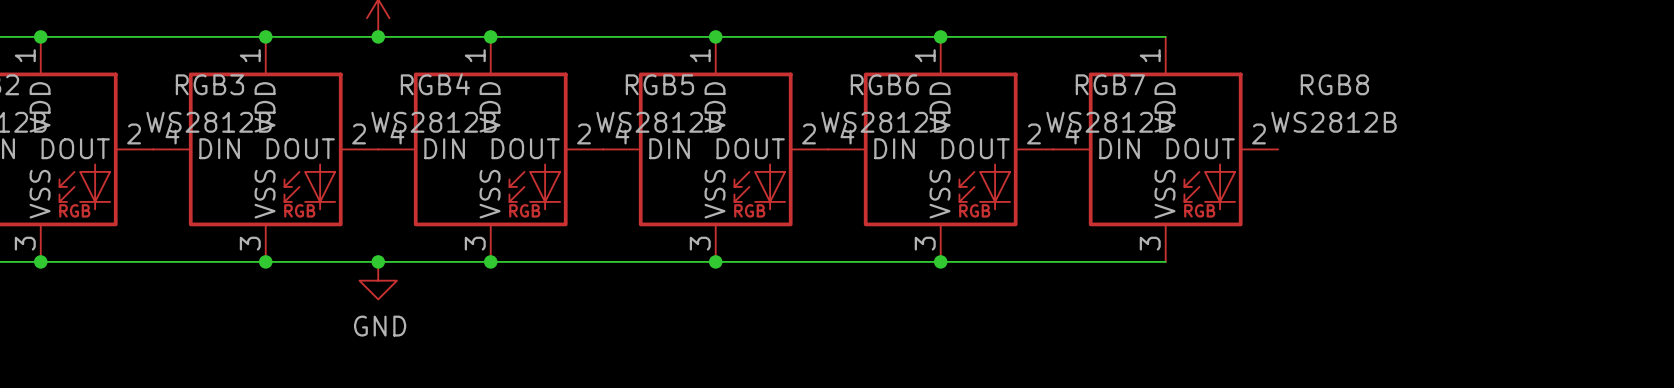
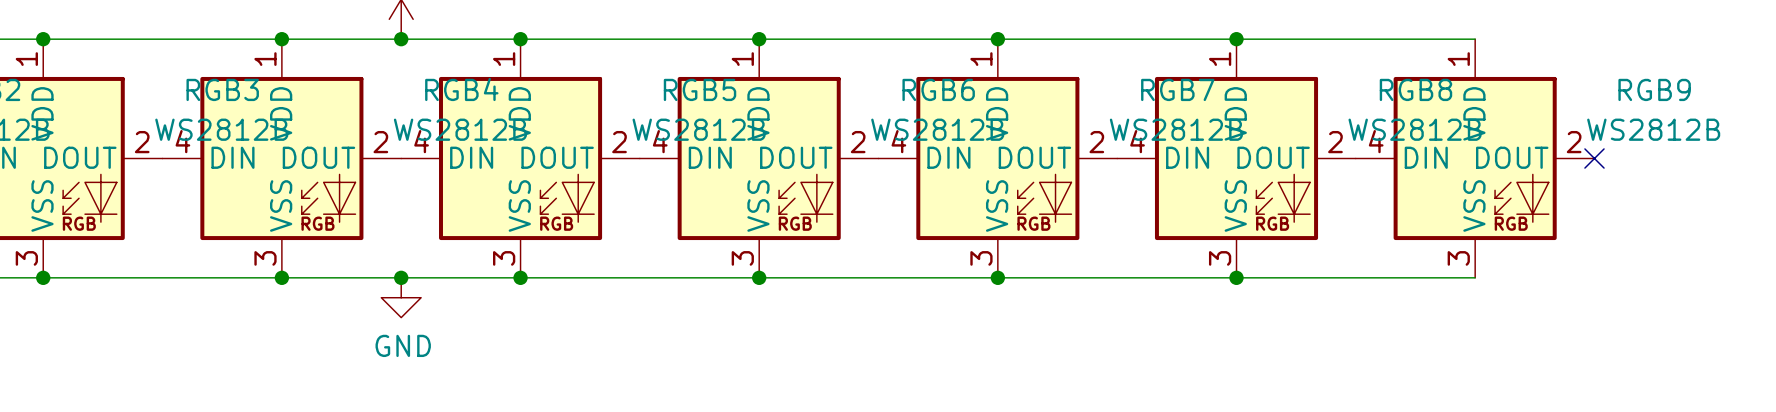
wire: none -> (1236, 39) (1475, 39)
junction: none -> (1236, 39)
RGB9: none -> WS2812B (1475, 158)
no-connect mark: none -> (1594, 158)
wire: none -> (1236, 277) (1475, 277)
junction: none -> (1236, 277)

